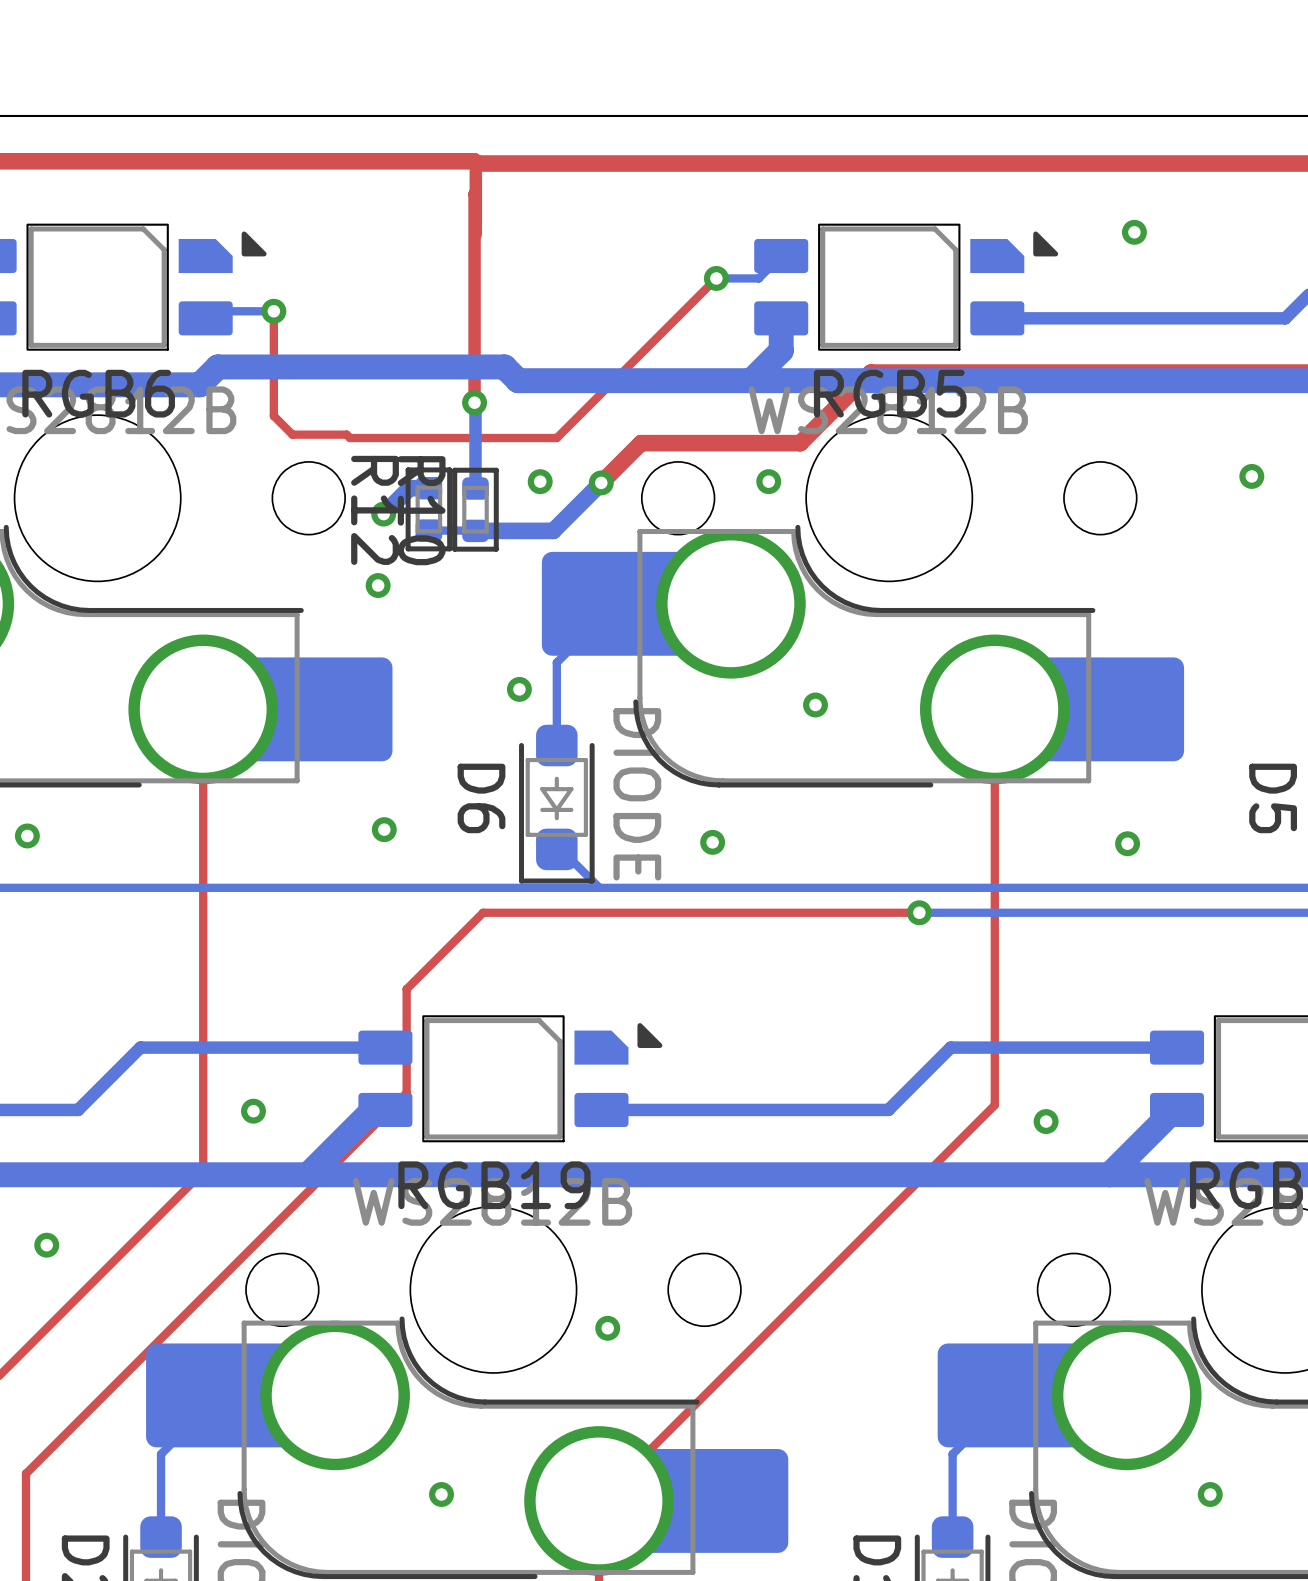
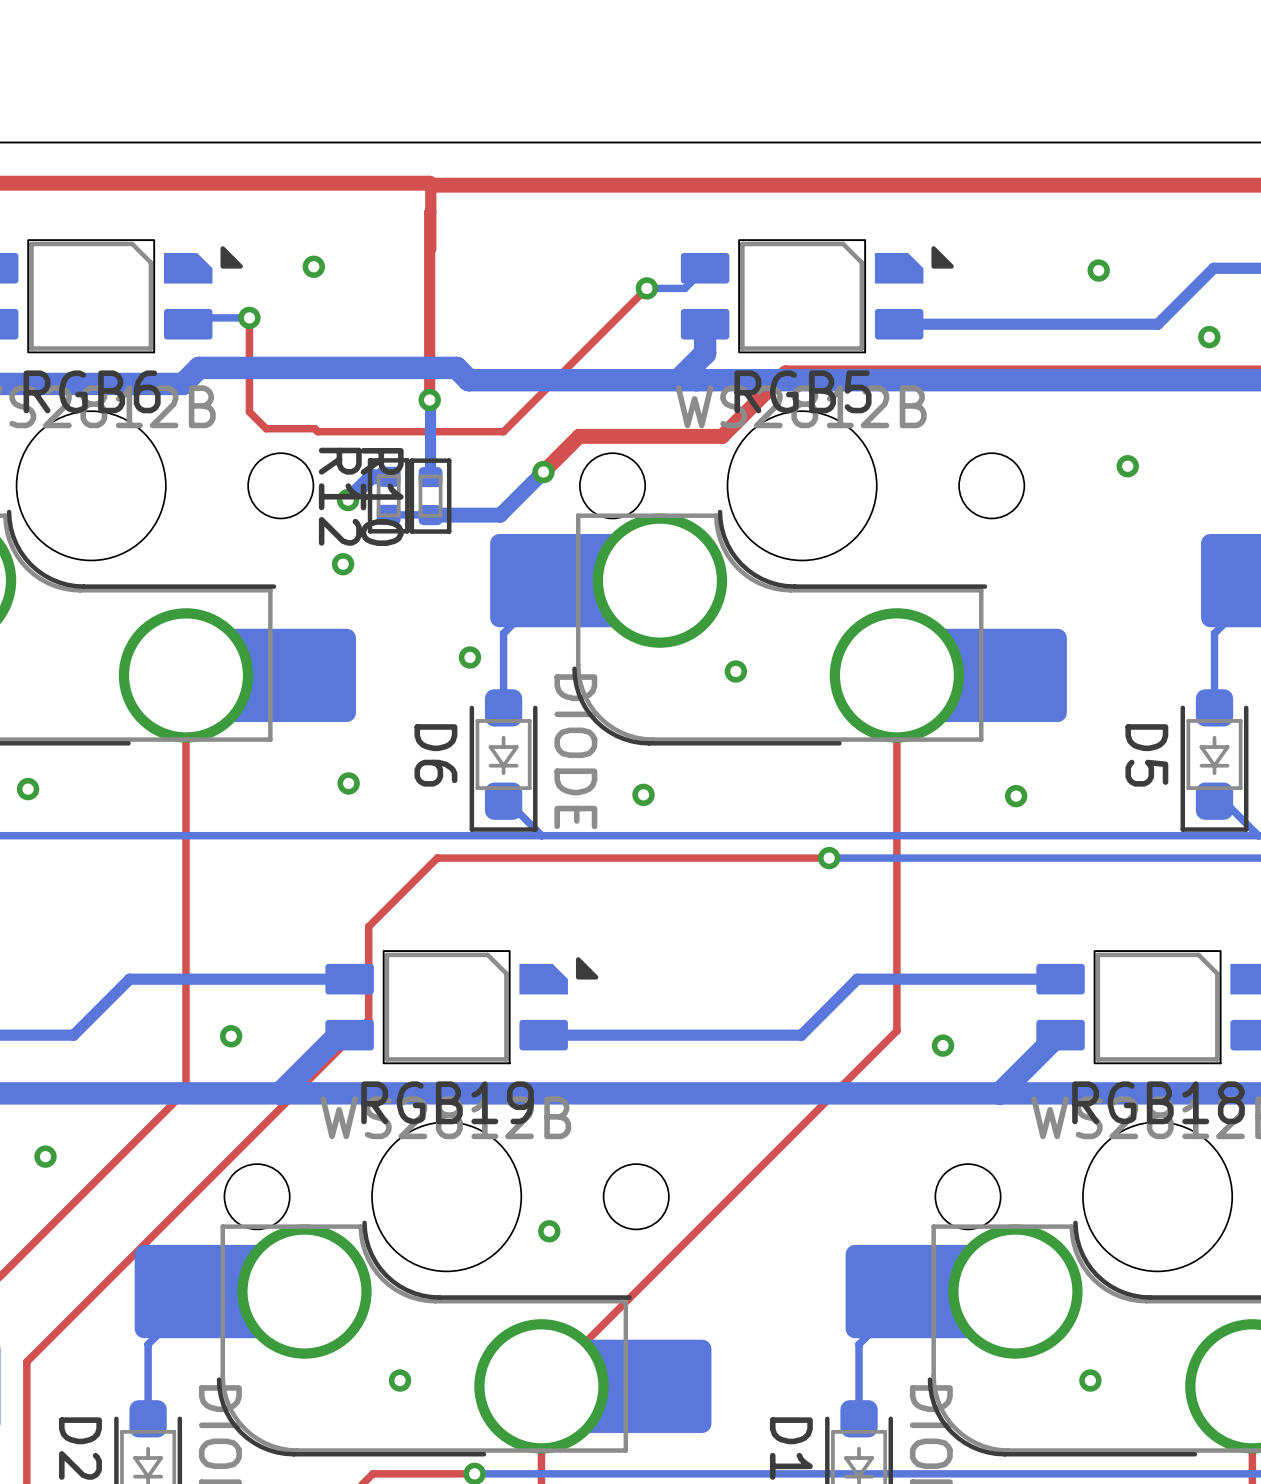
via position: (1134, 232) -> (1098, 270)
via: none -> (313, 266)
via: (540, 481) -> none
via: (768, 481) -> none

